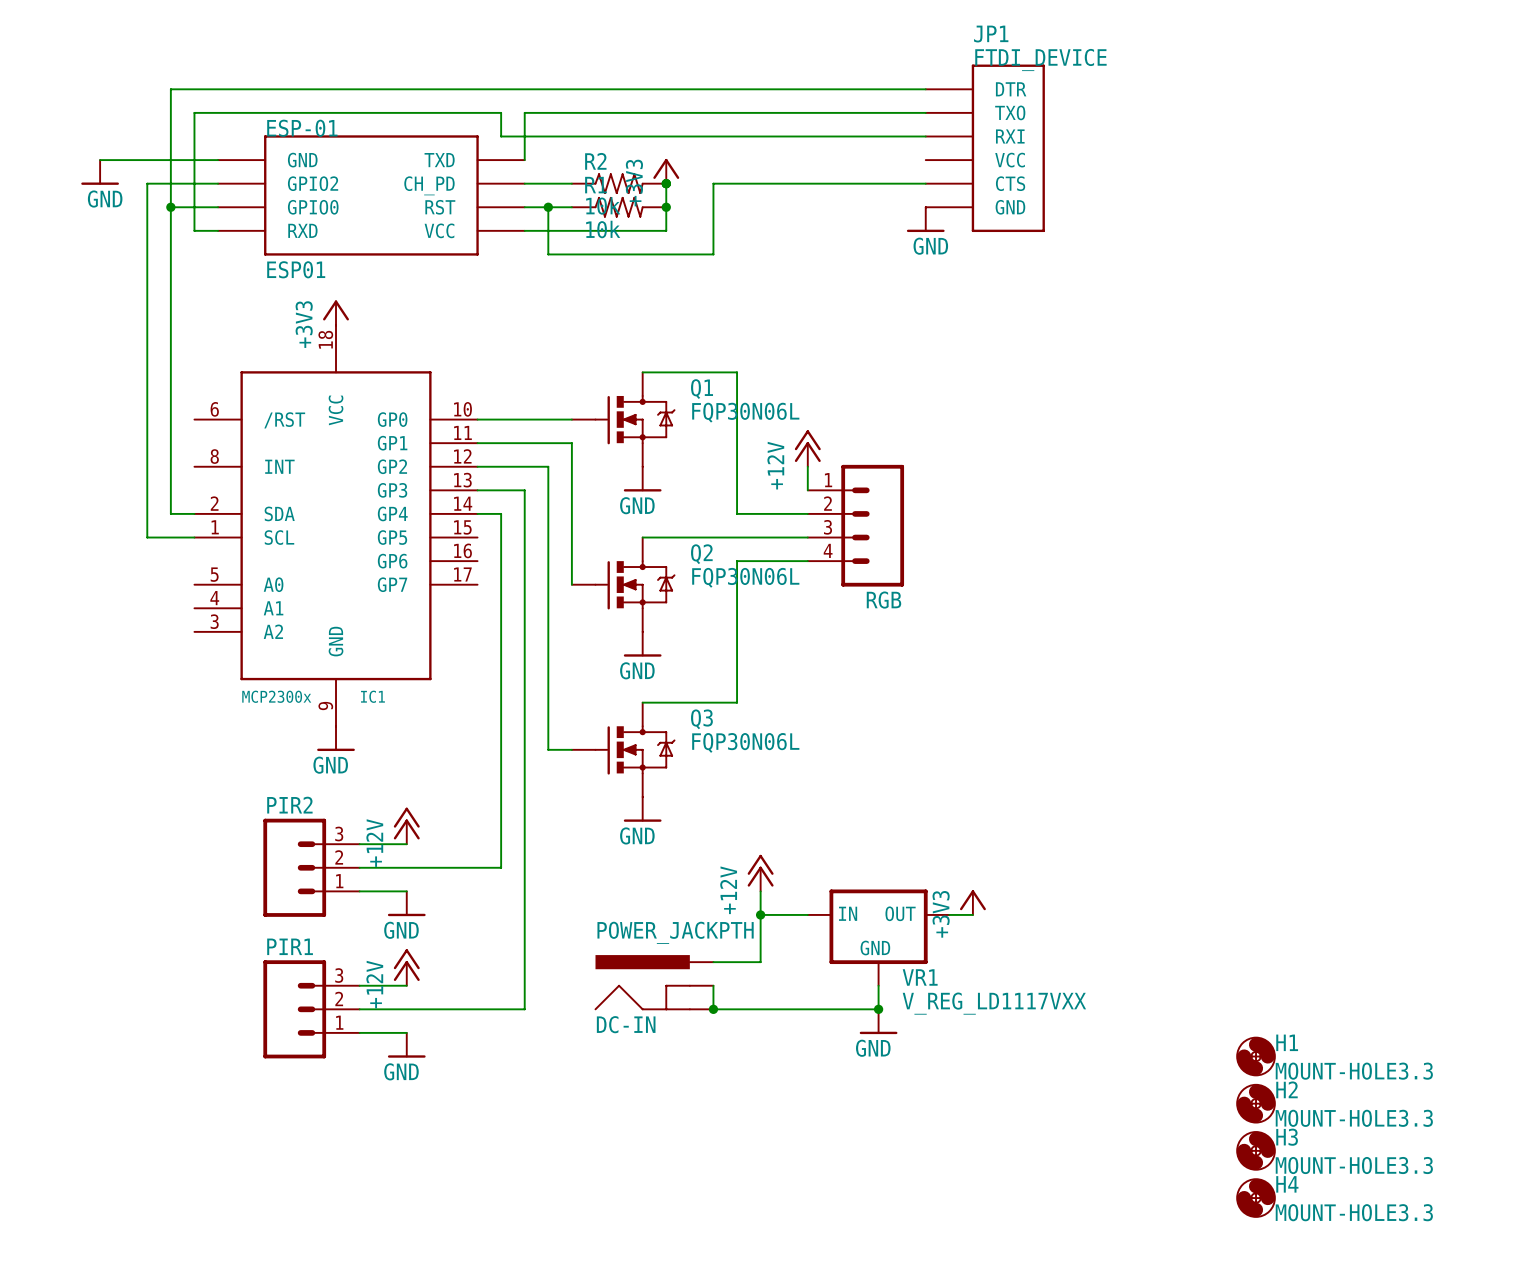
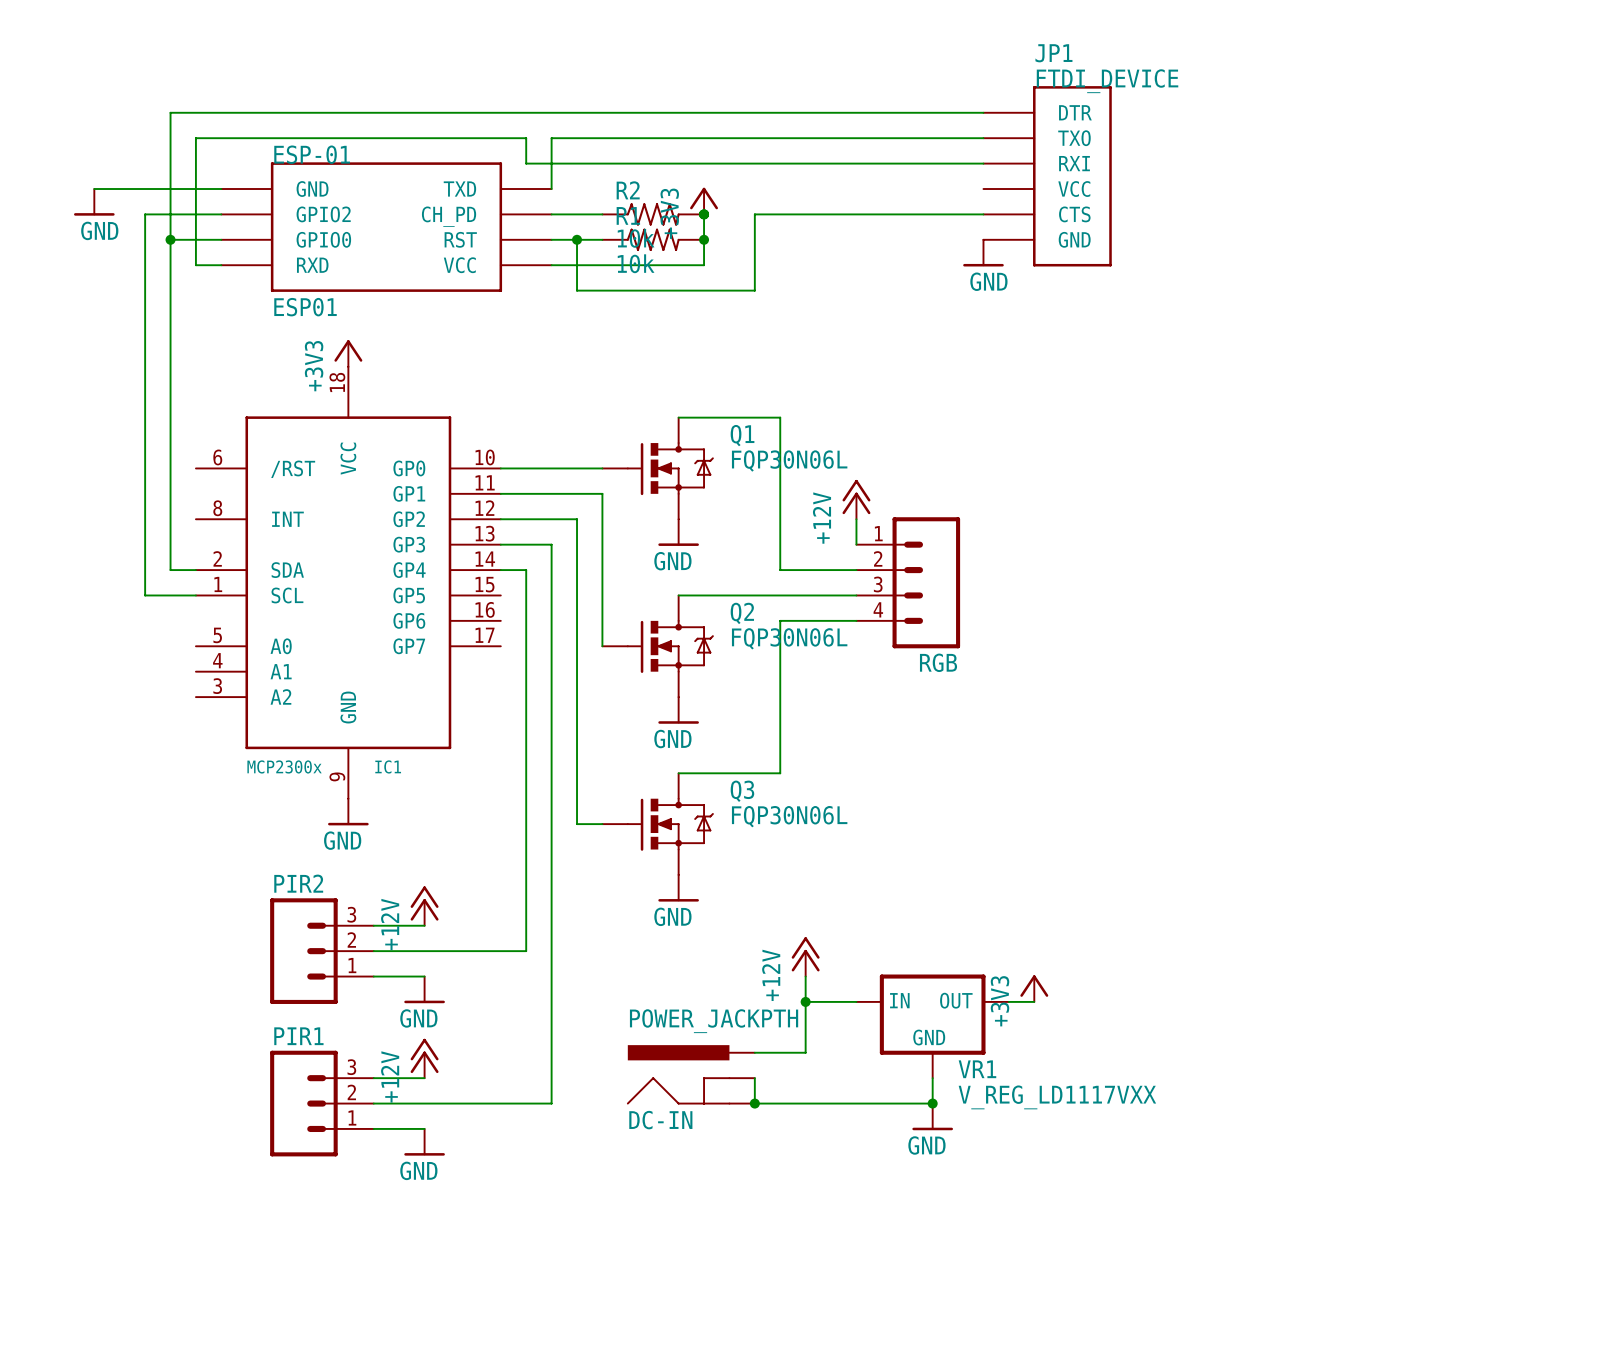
H1: MOUNT-HOLE3.3 (1256, 1056) -> none
H2: MOUNT-HOLE3.3 (1256, 1103) -> none
H3: MOUNT-HOLE3.3 (1256, 1150) -> none
H4: MOUNT-HOLE3.3 (1256, 1198) -> none

